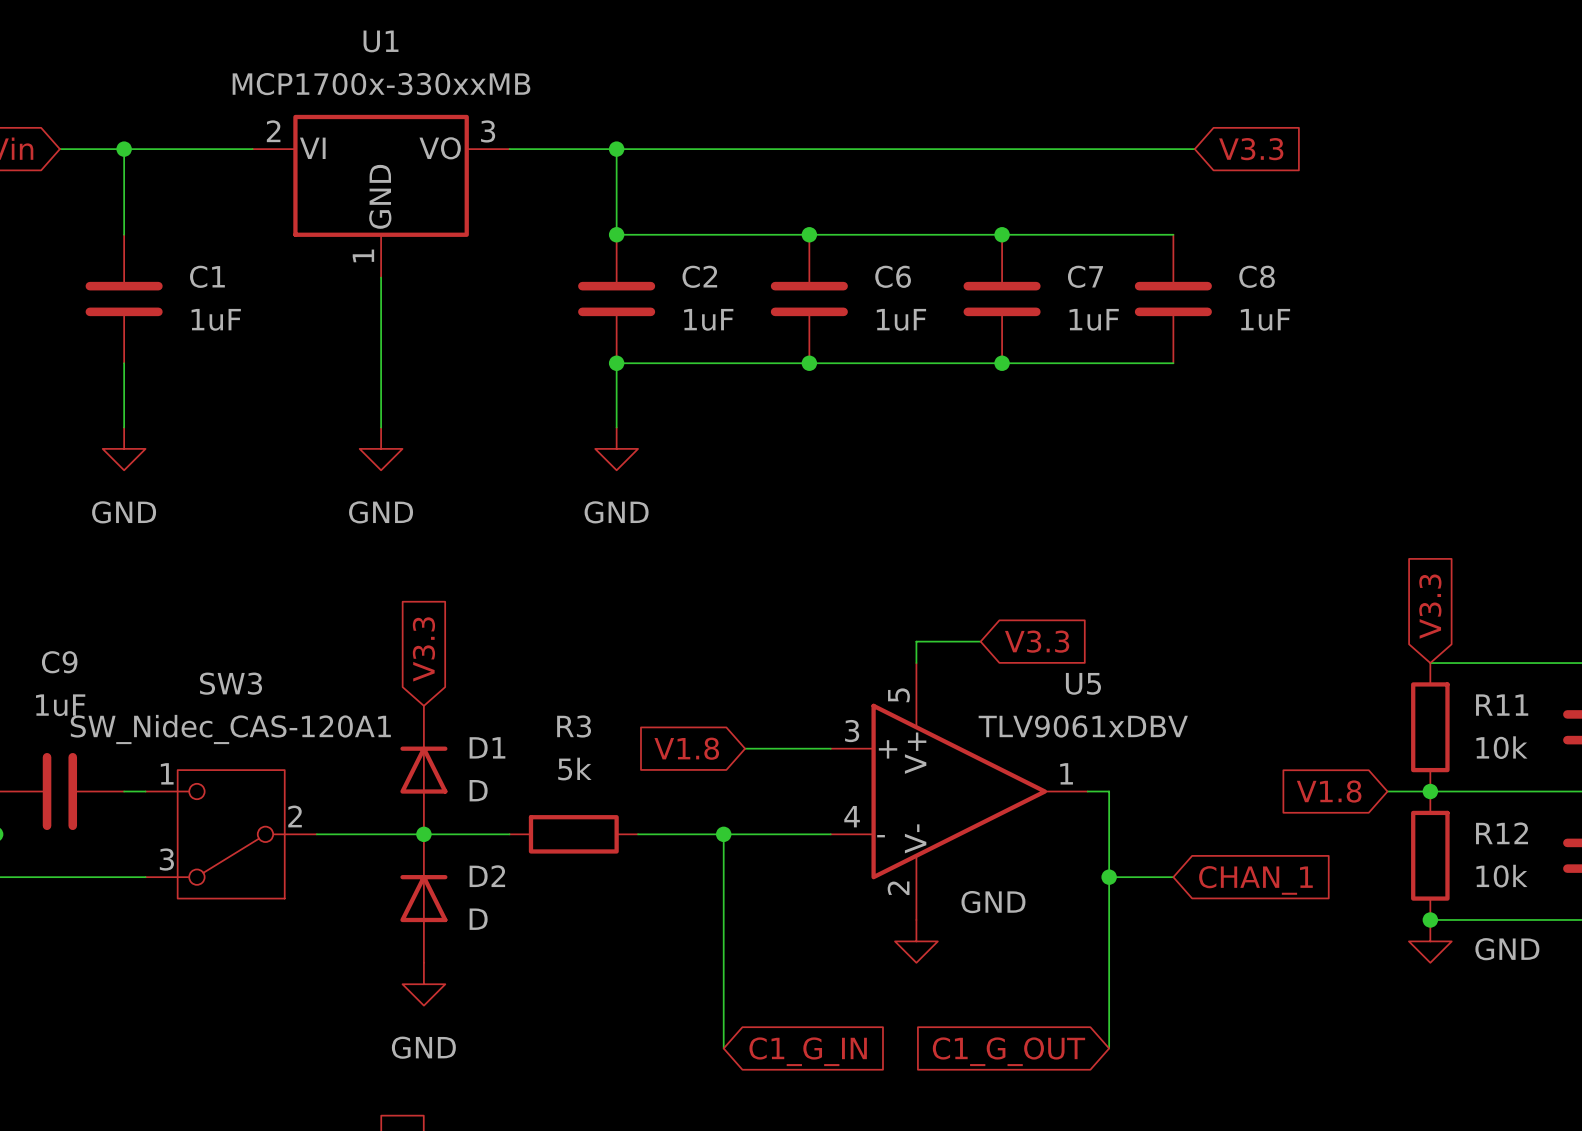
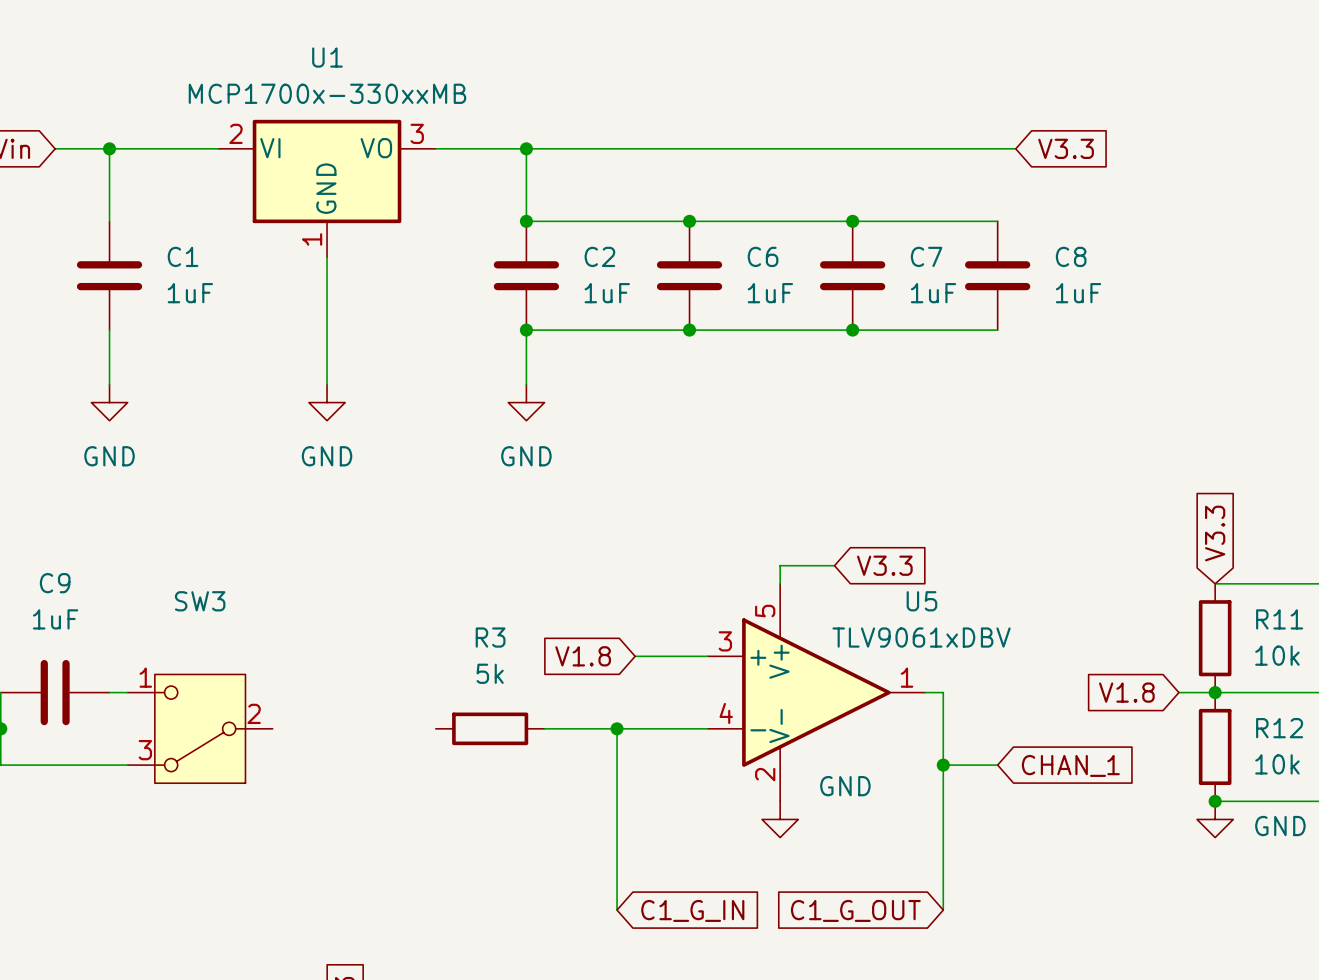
global label: V3.3 (423, 649) -> none
SW3 value: SW_Nidec_CAS-120A1 (230, 729) -> none
D1: D (423, 770) -> none
wire: (316, 834) (509, 834) -> none
junction: (423, 834) -> none
D2: D (423, 898) -> none
power symbol: GND (423, 984) -> none

